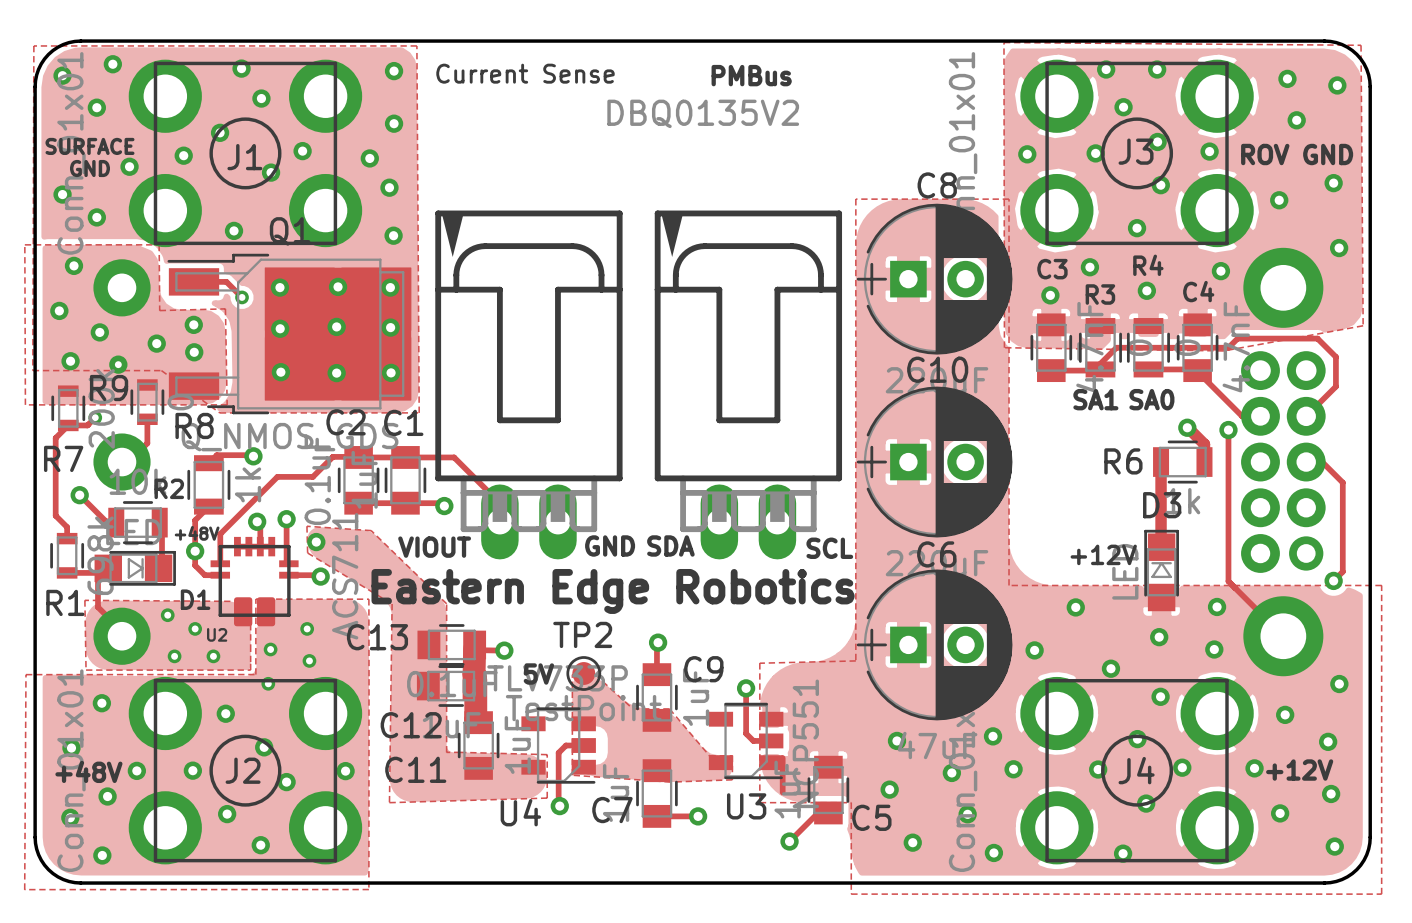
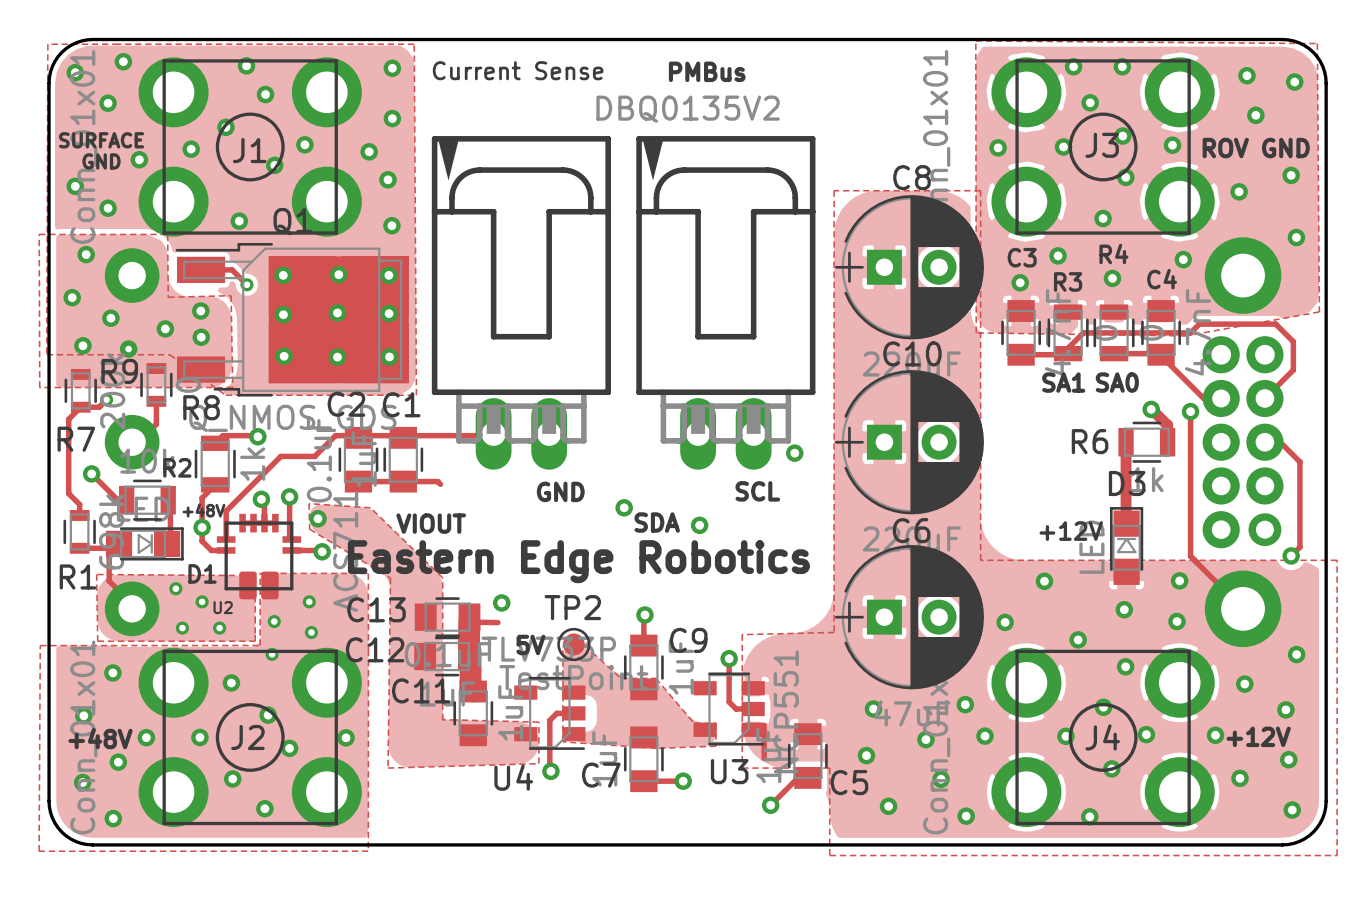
text position: PMBus (751, 75) -> PMBus (707, 71)
part position: (528, 384) -> (521, 302)
part position: (748, 384) -> (725, 302)
track: (332, 456) (454, 457) (499, 503) (499, 521) -> (333, 437) (335, 435) (491, 435) (493, 433)
via: none -> (794, 453)
via: (444, 506) -> none
via: none -> (624, 507)
text position: GND (610, 545) -> GND (560, 491)
via: none -> (699, 525)
text position: SCL (829, 548) -> SCL (757, 491)
text position: Eastern Edge Robotics (613, 591) -> Eastern Edge Robotics (578, 561)
via position: (504, 650) -> (501, 602)
C12 name position: C12 (411, 725) -> C12 (375, 649)
C11 name position: C11 (415, 769) -> C11 (421, 690)

